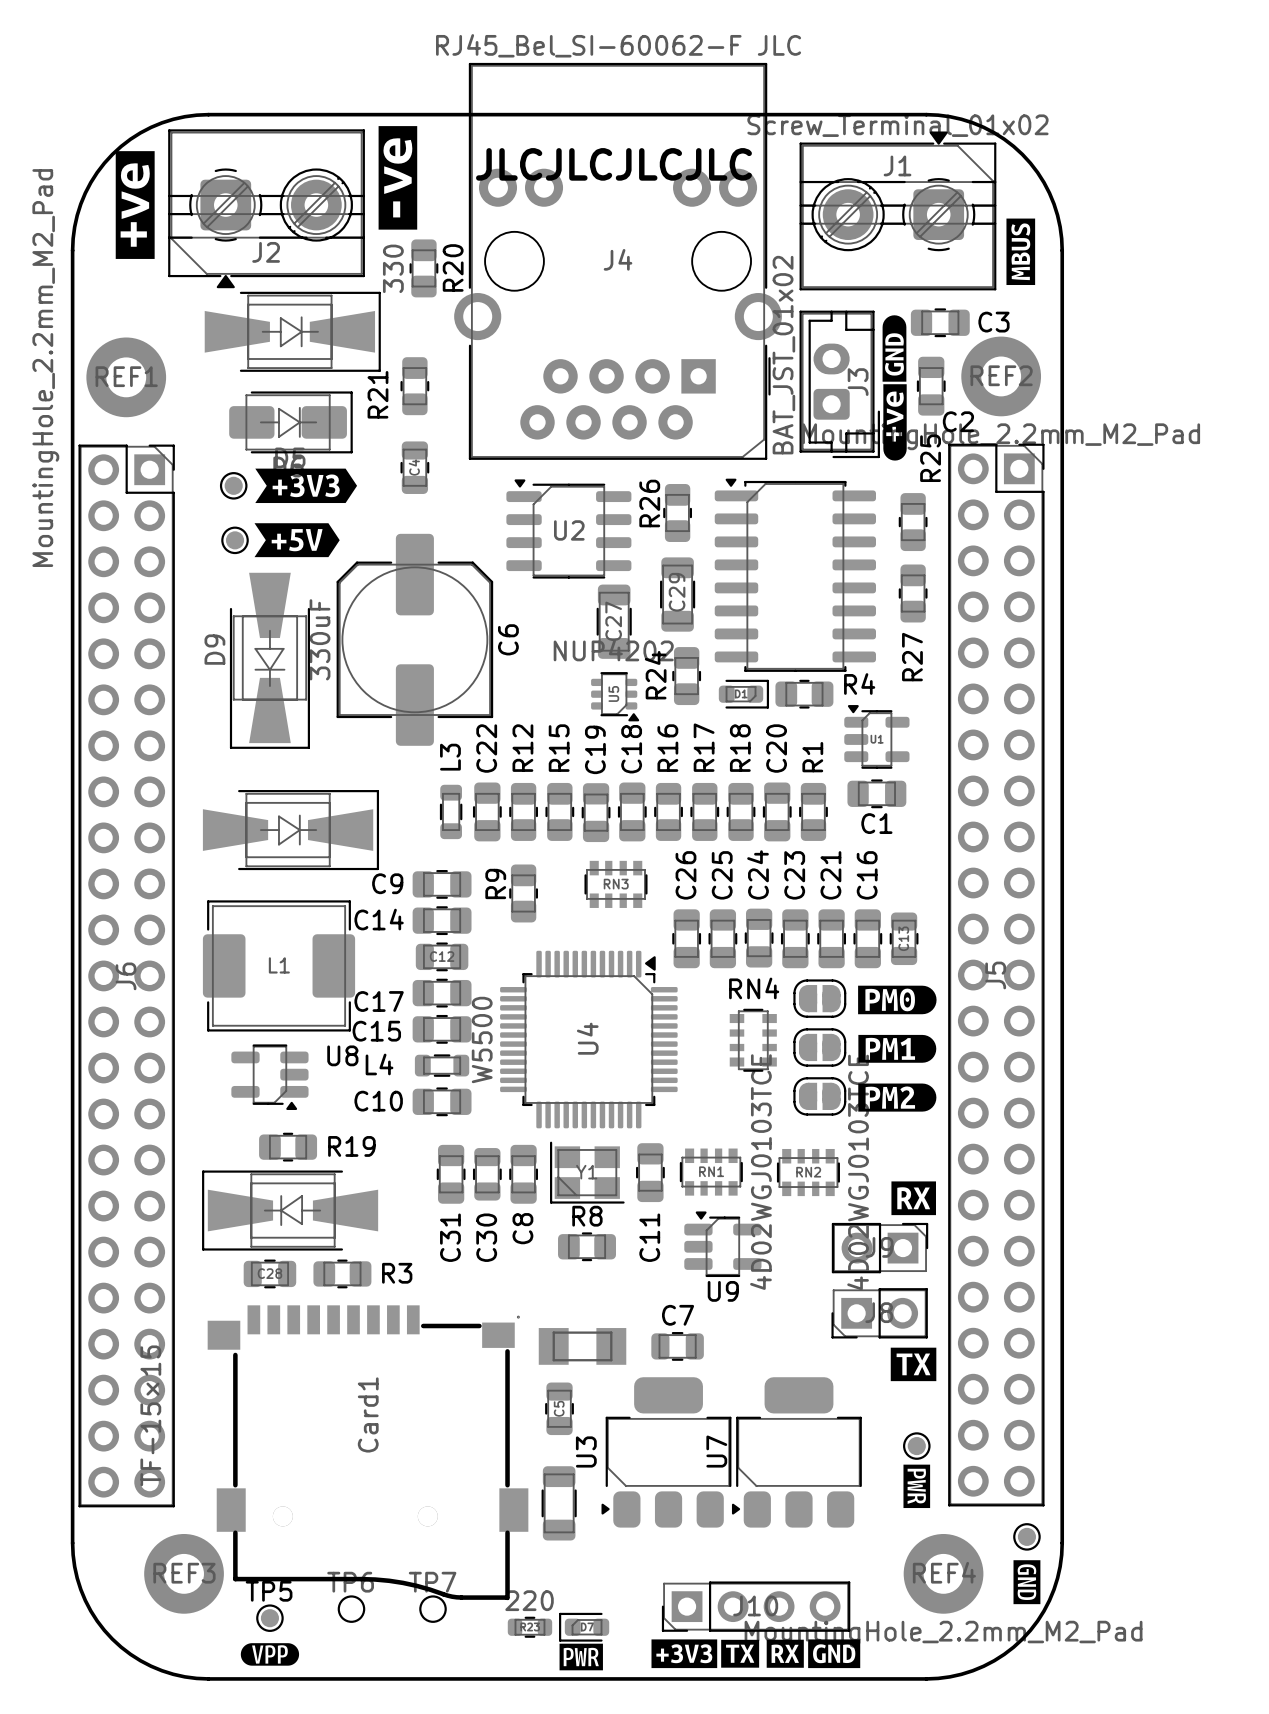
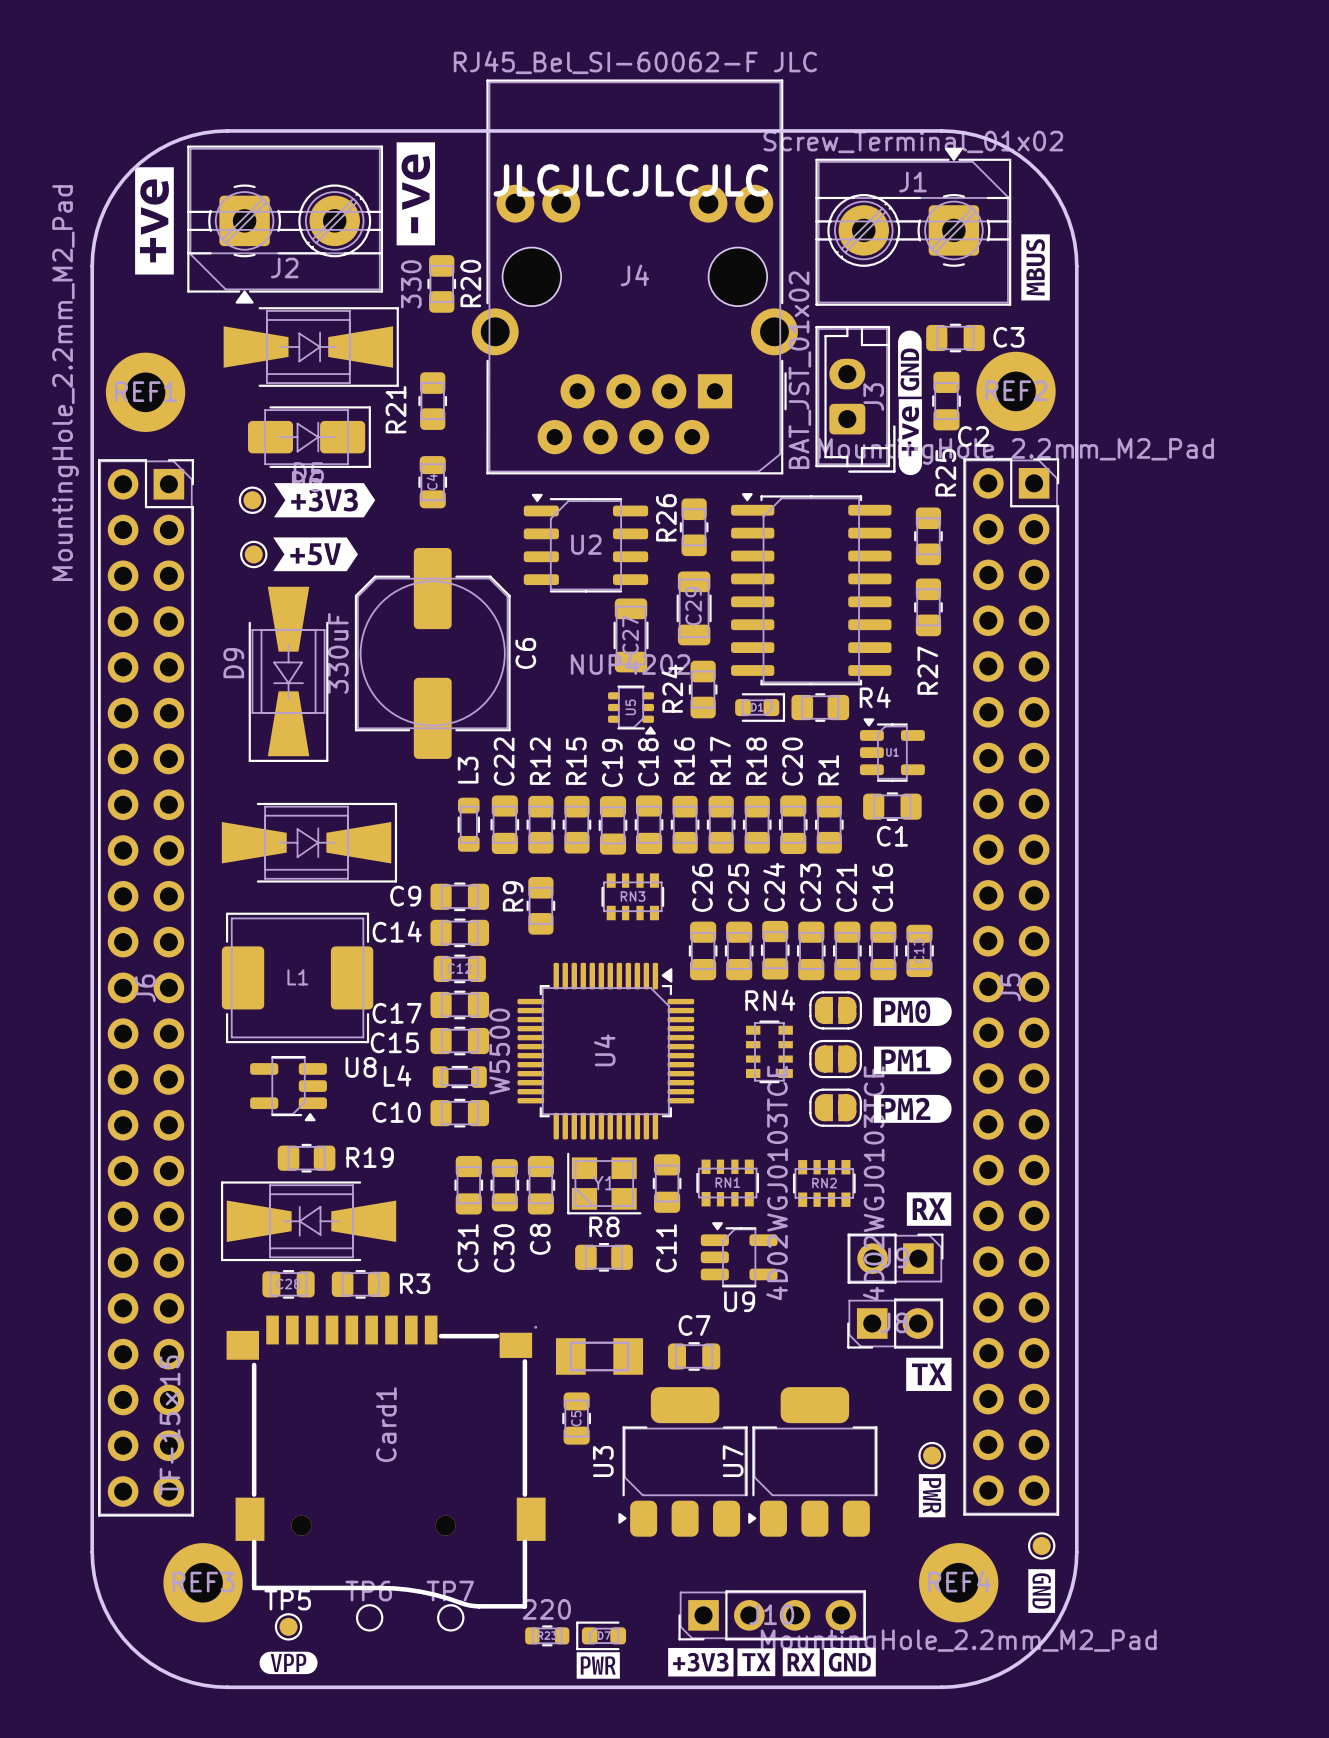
part: (559, 1503) -> none

